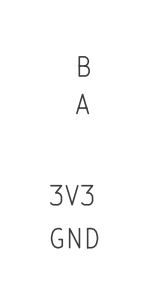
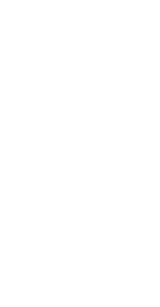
text: B (84, 66) -> none
text: A (82, 103) -> none
text: 3V3 (71, 195) -> none
text: GND (74, 238) -> none

